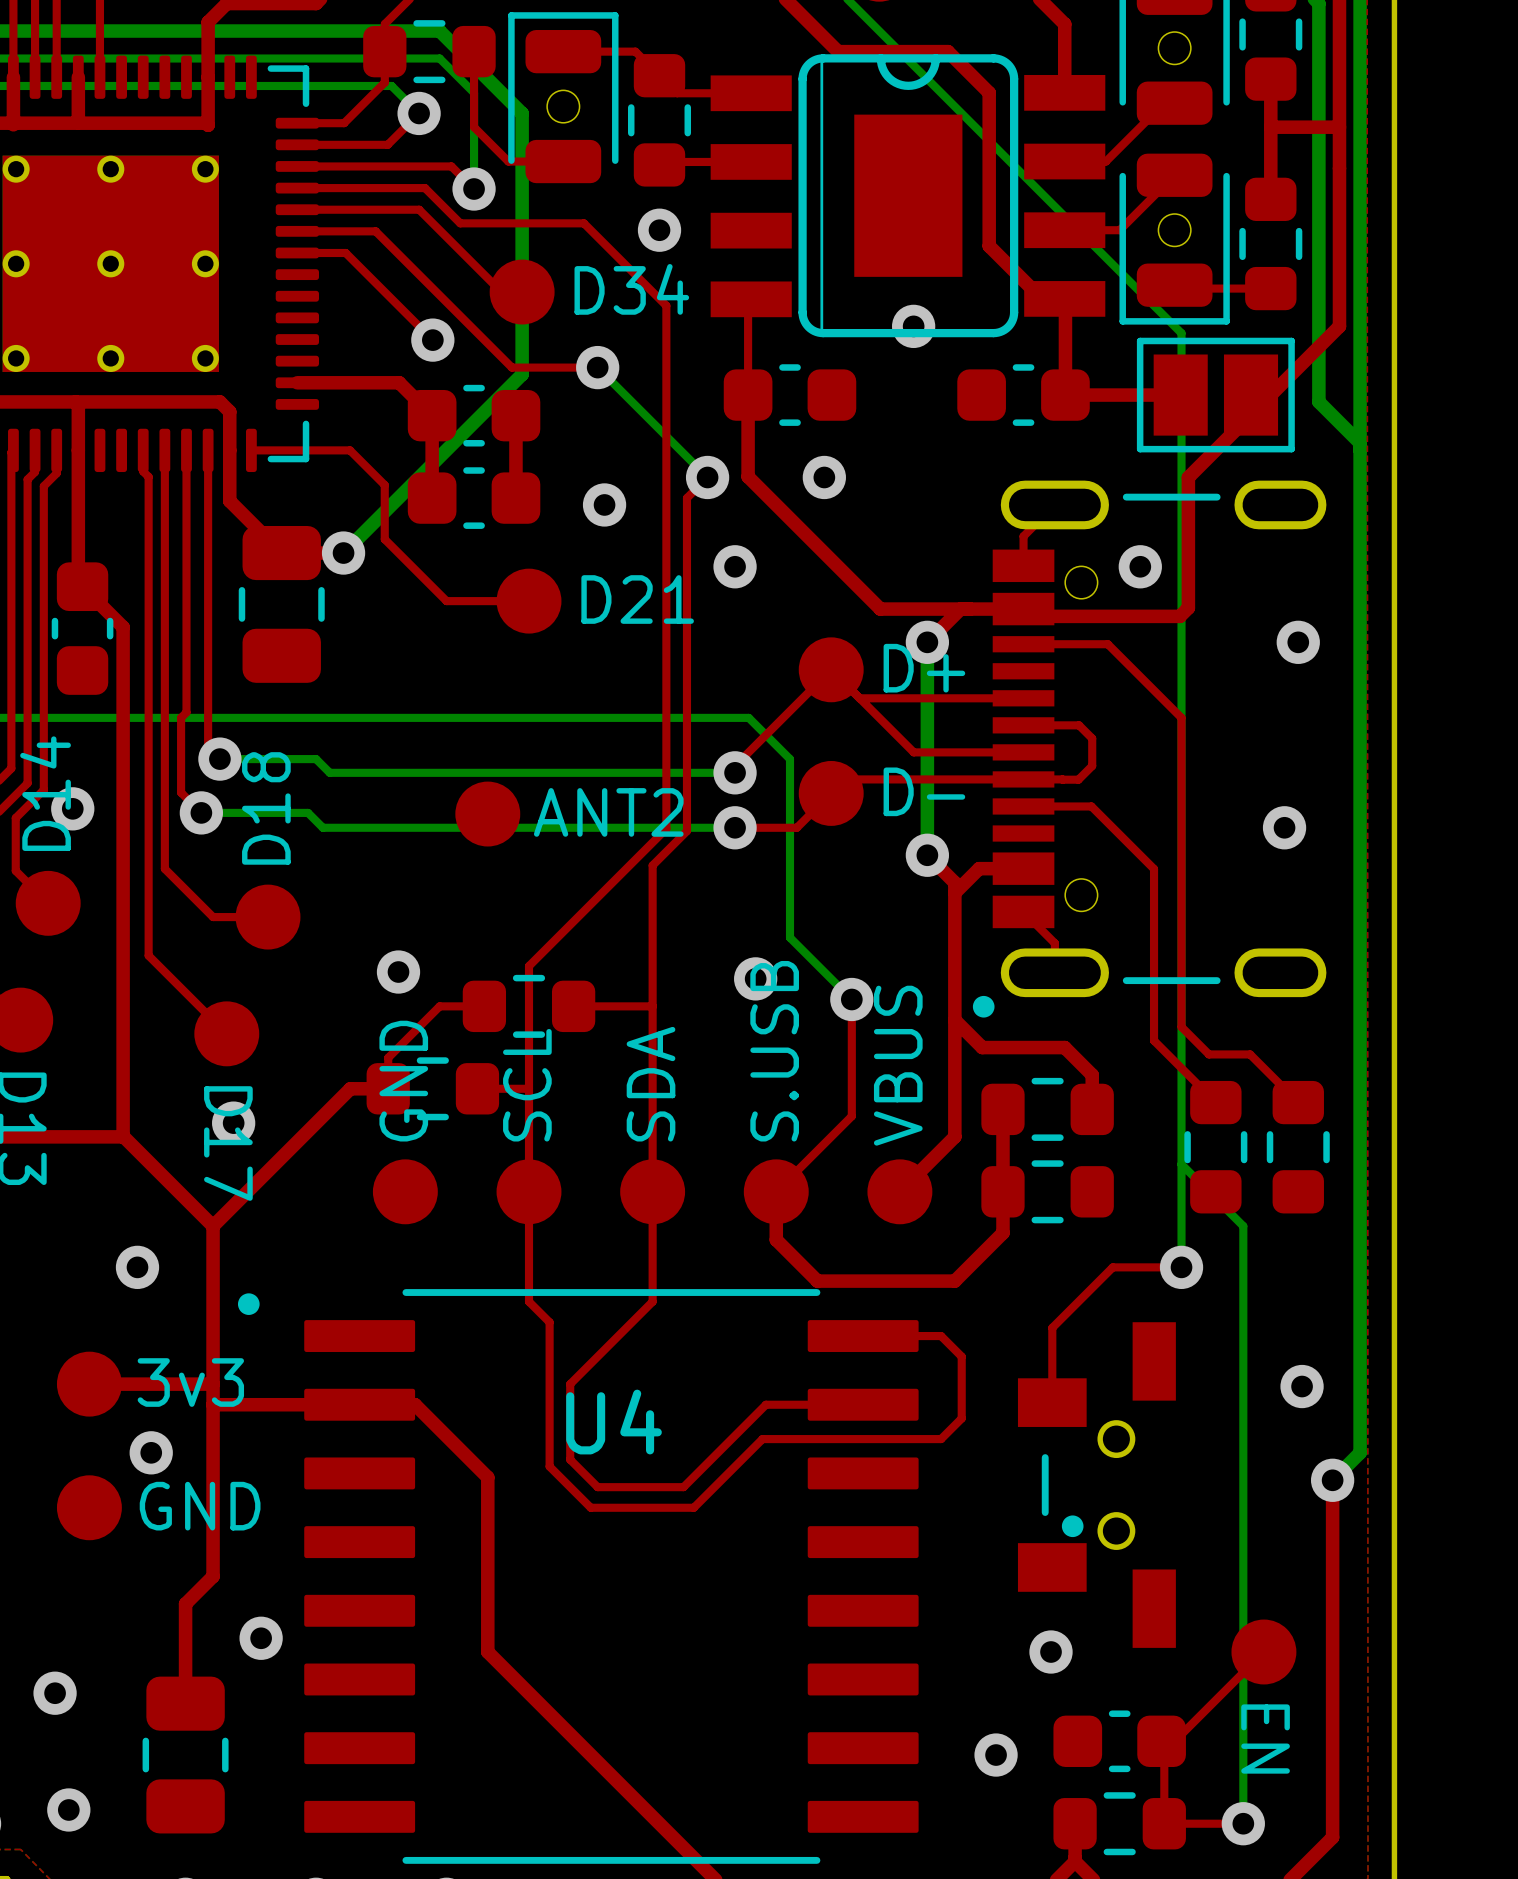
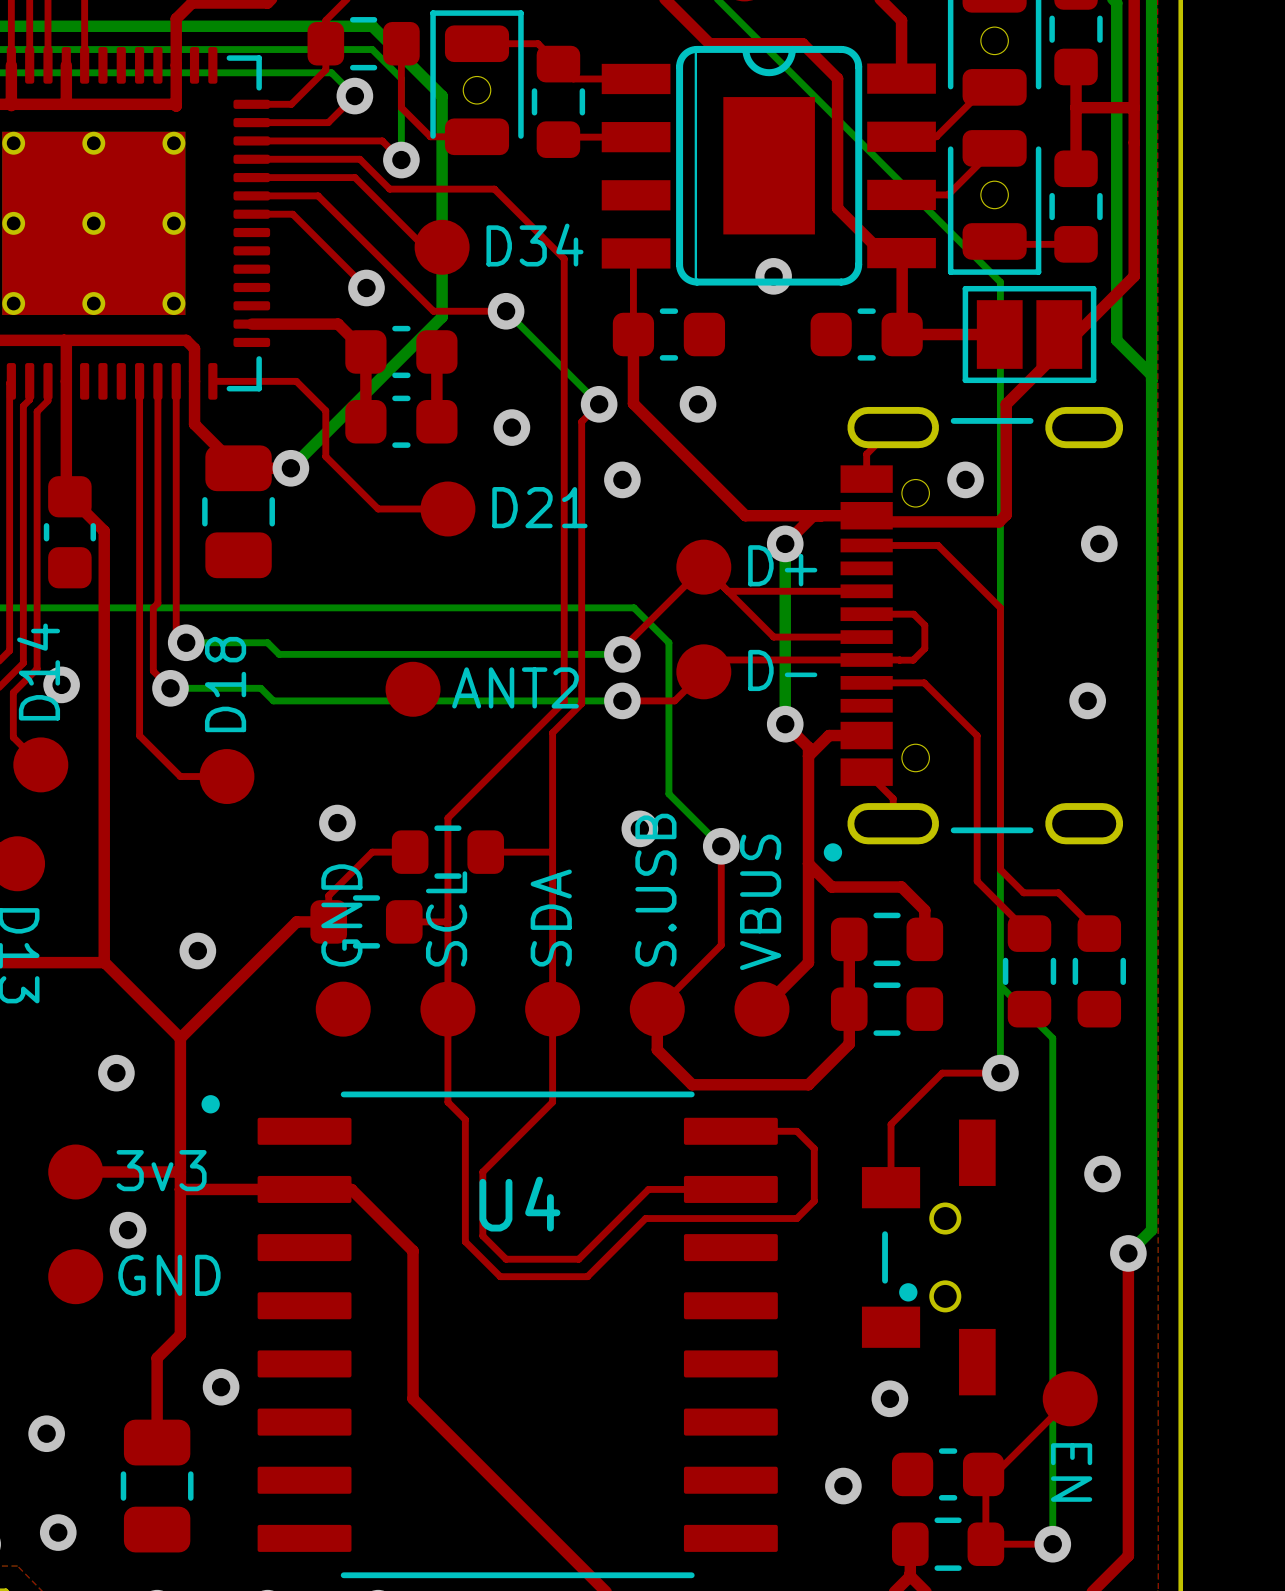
via: (659, 230) -> none
top track: (143, 450) (143, 471) (148, 476) (148, 955) (226, 1033) -> none
part: D17 (226, 1033) -> none

